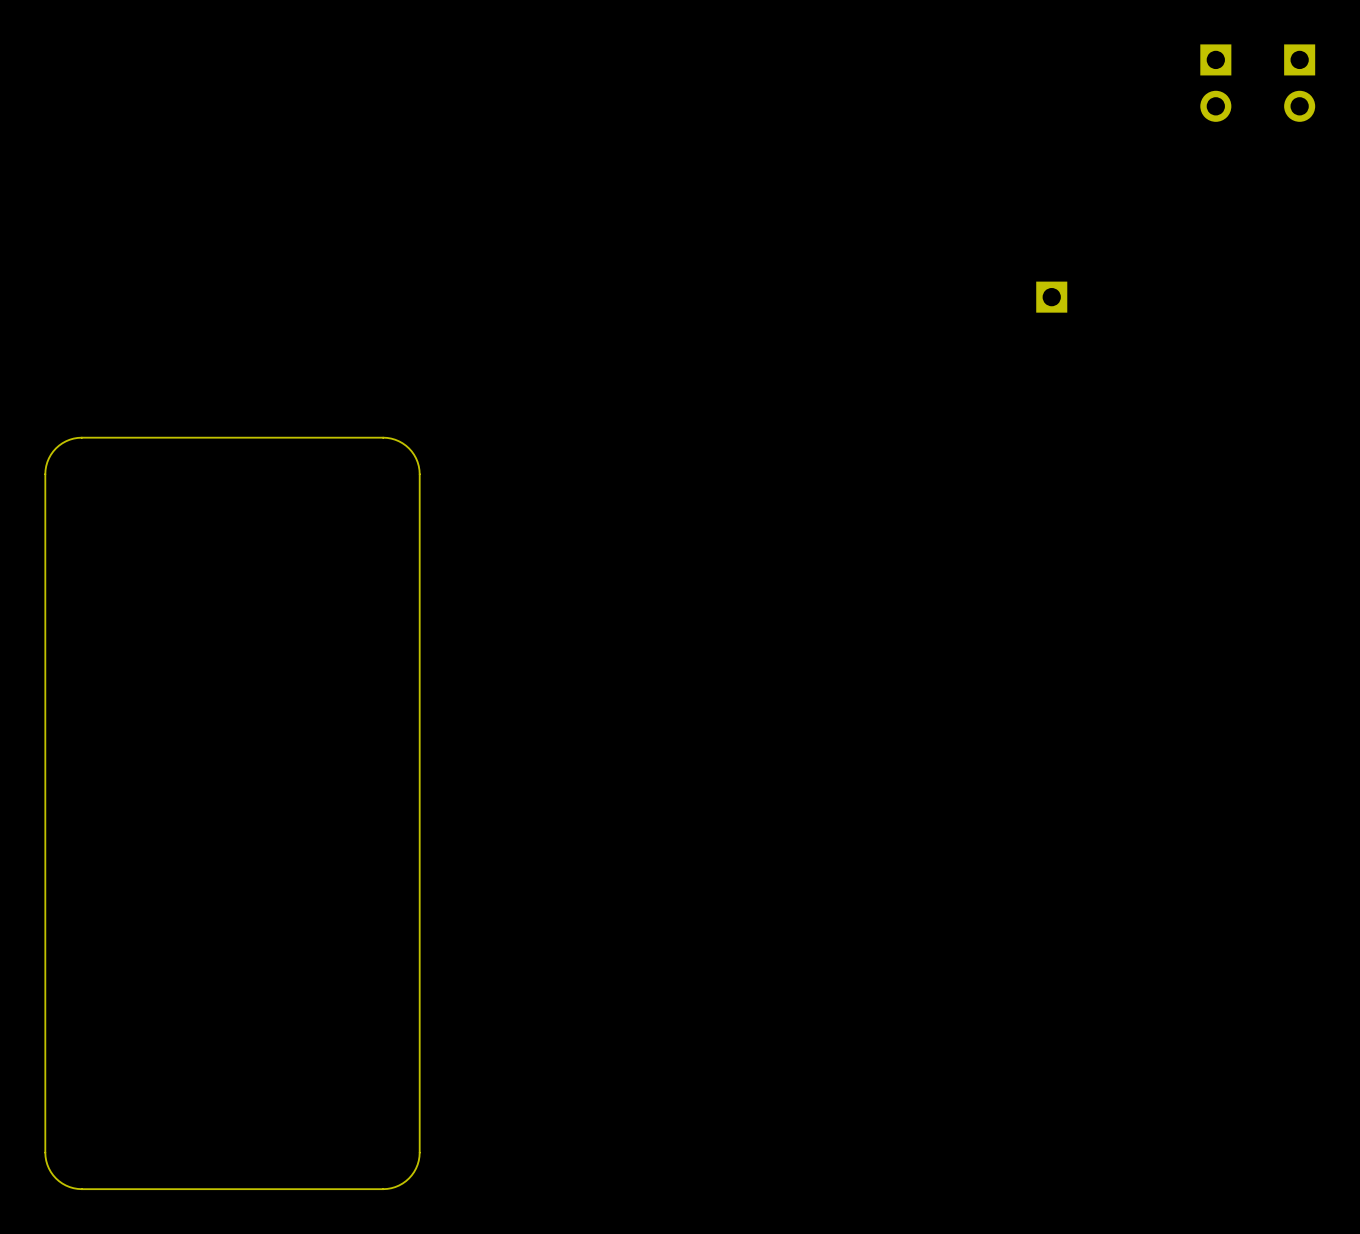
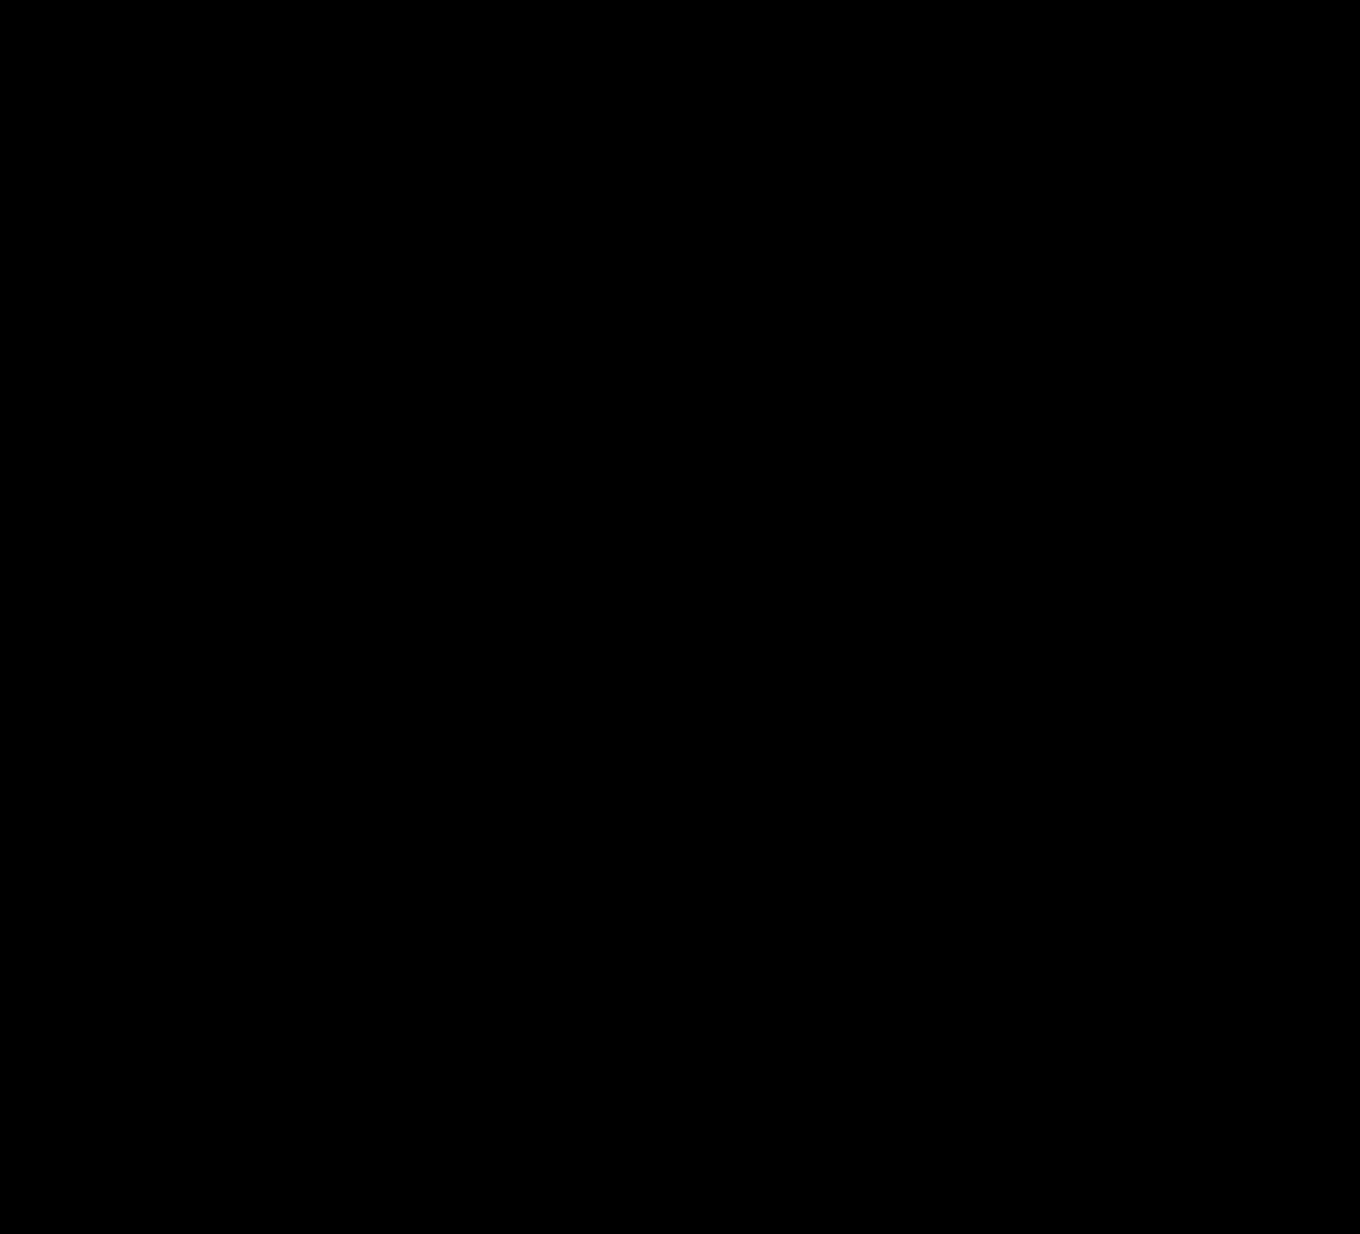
part: (1215, 83) -> none
part: (1299, 83) -> none
part: (1051, 297) -> none
board edge: (383, 437) (77, 437) (59, 445) (48, 458) (45, 474) (45, 1152) (50, 1172) (65, 1185) (81, 1189) (383, 1189) (402, 1183) (416, 1168) (419, 1152) (419, 474) (417, 462) (409, 448) (395, 439) (383, 437) -> none

